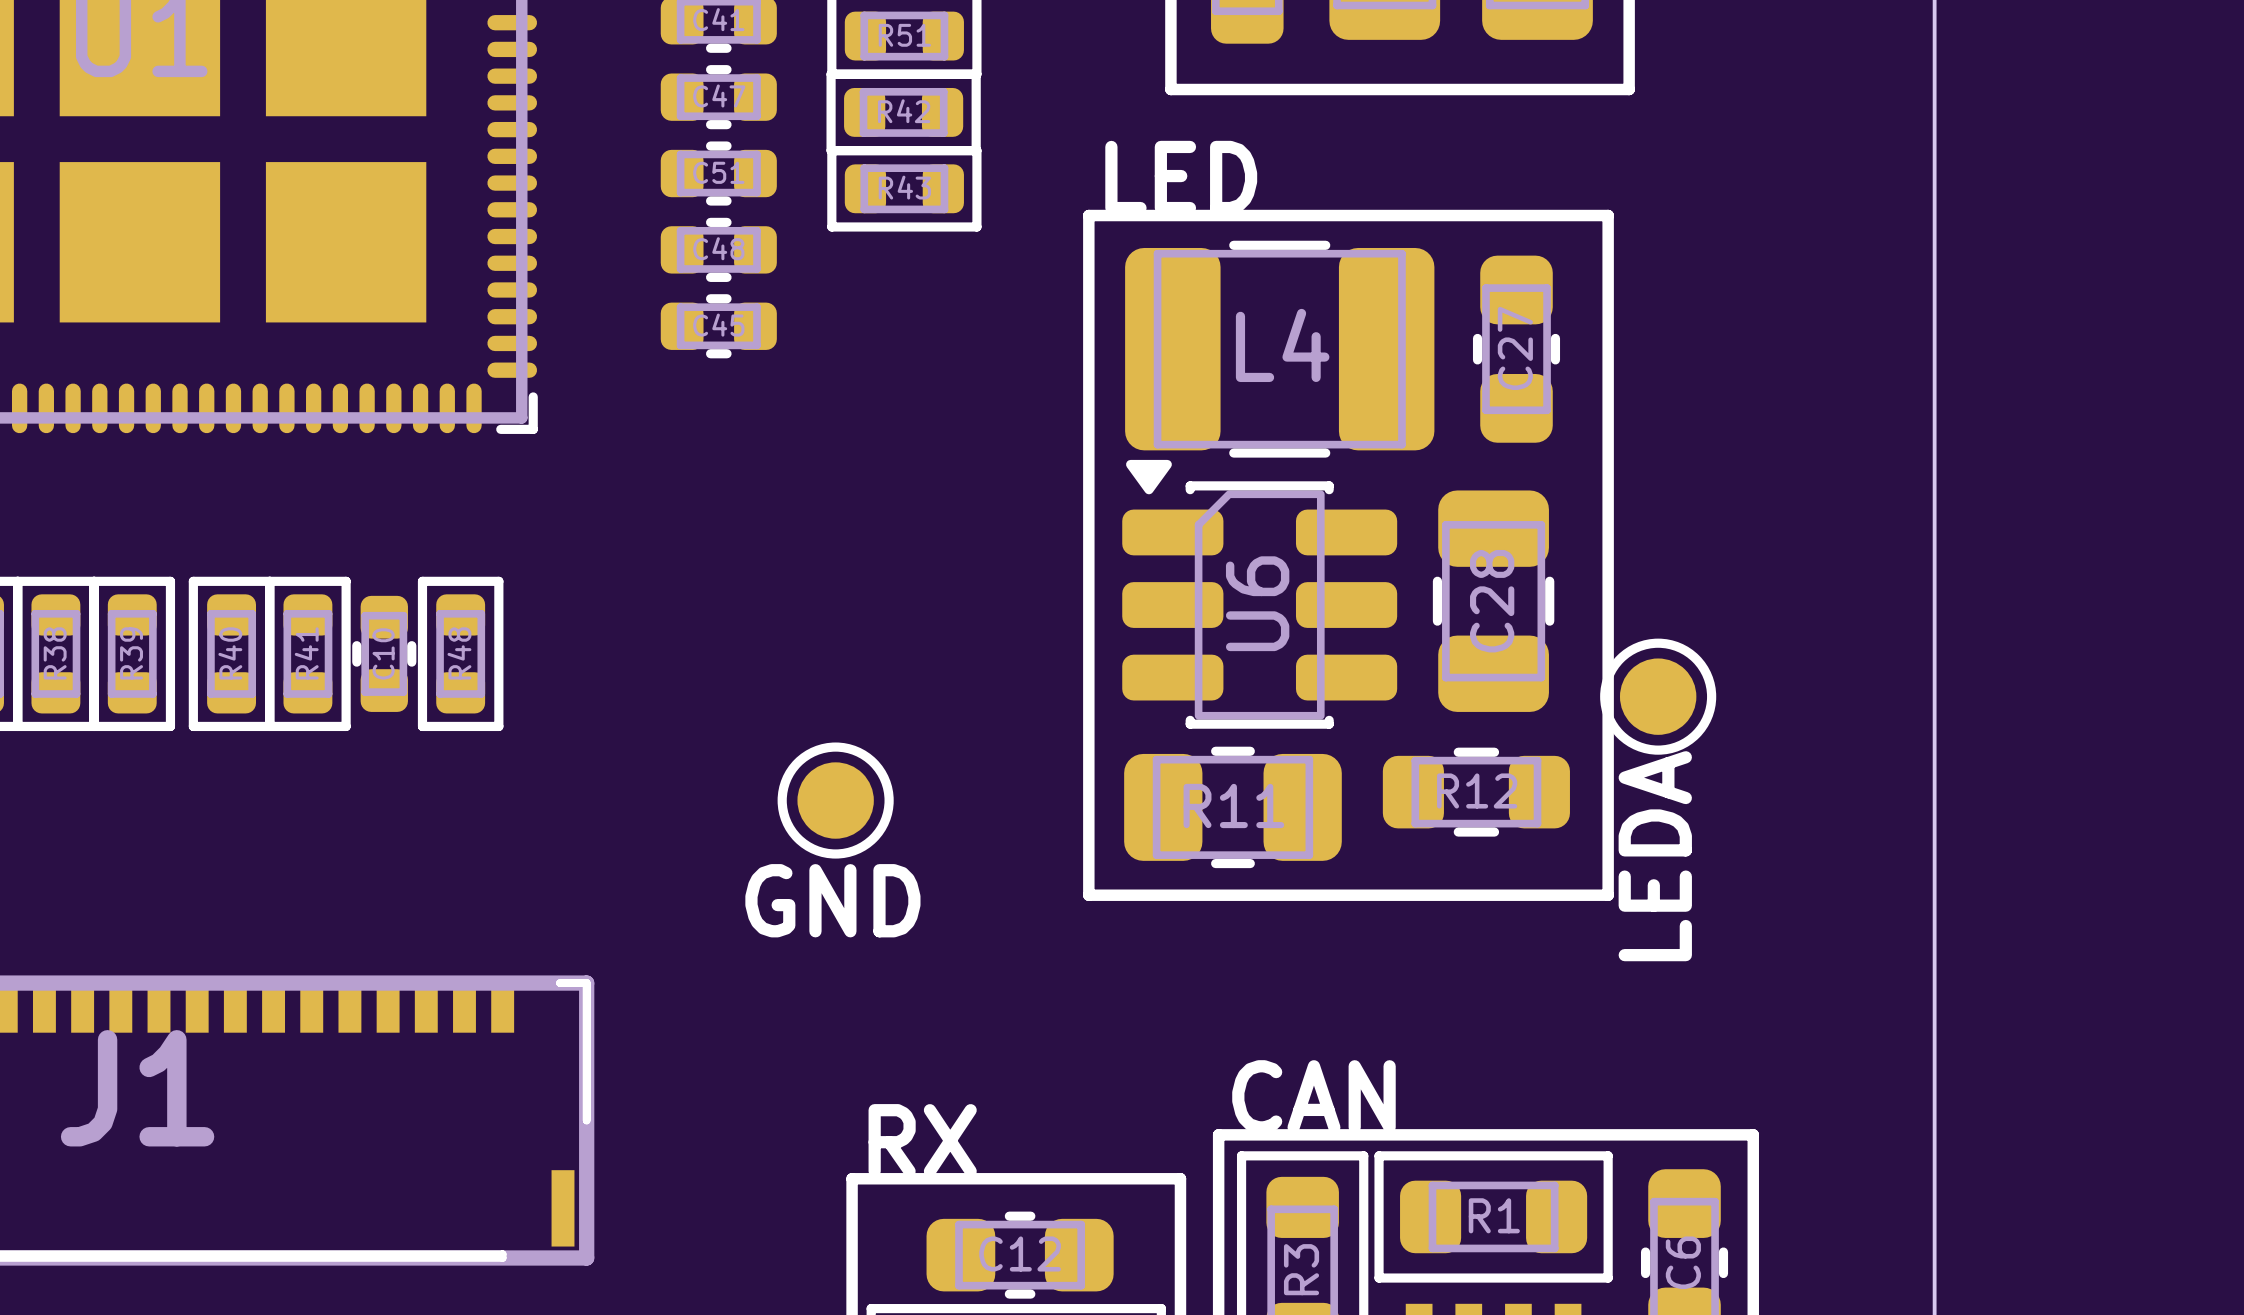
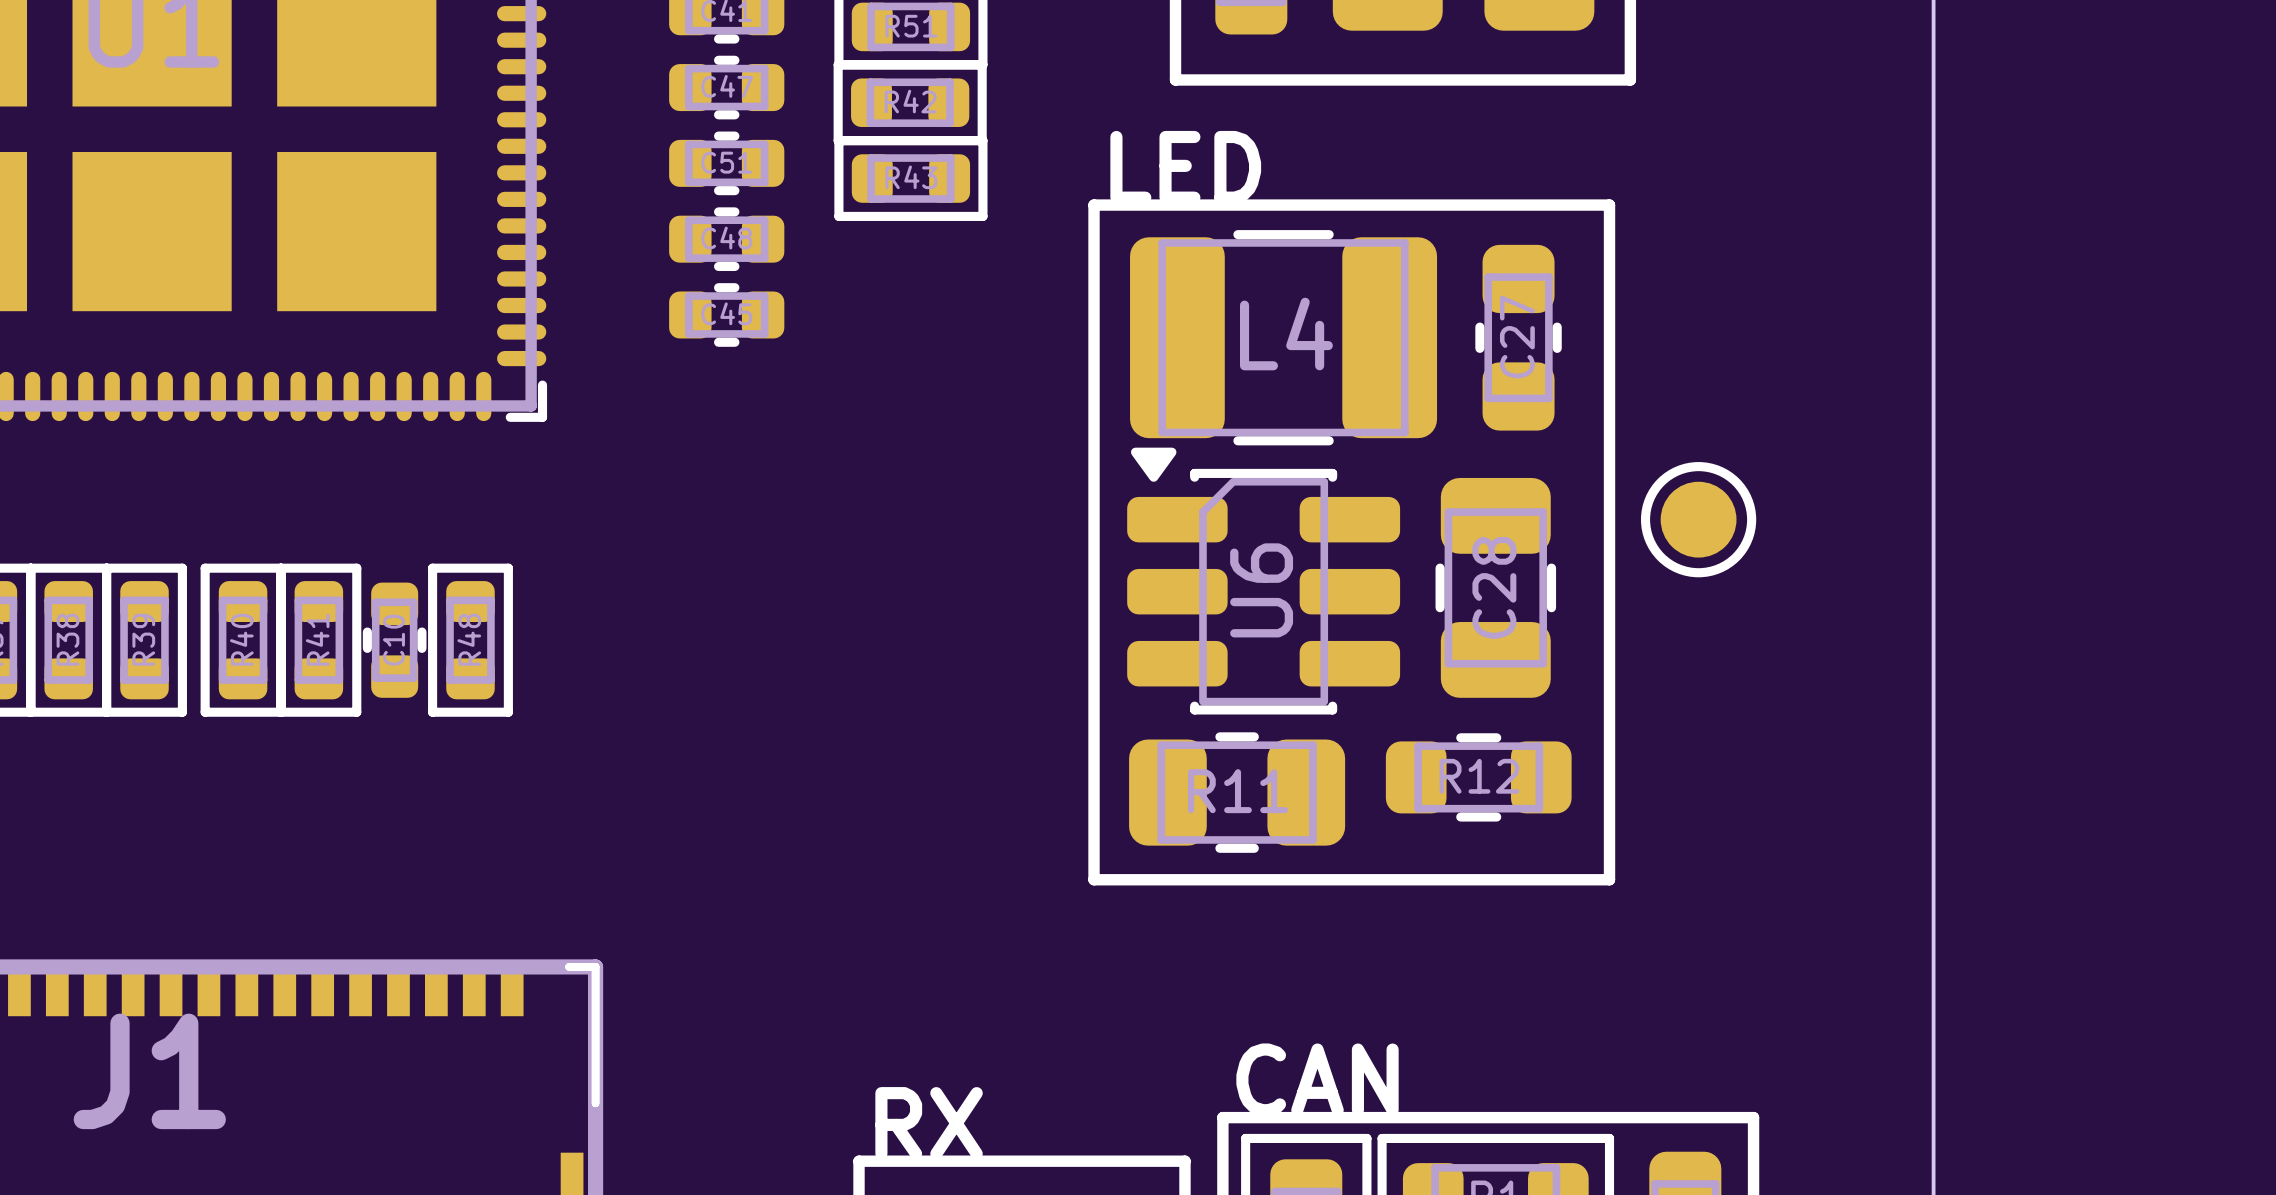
part position: (1658, 696) -> (1698, 519)
part: (835, 800) -> none
text: LEDA (1655, 856) -> none
text: GND (832, 900) -> none

